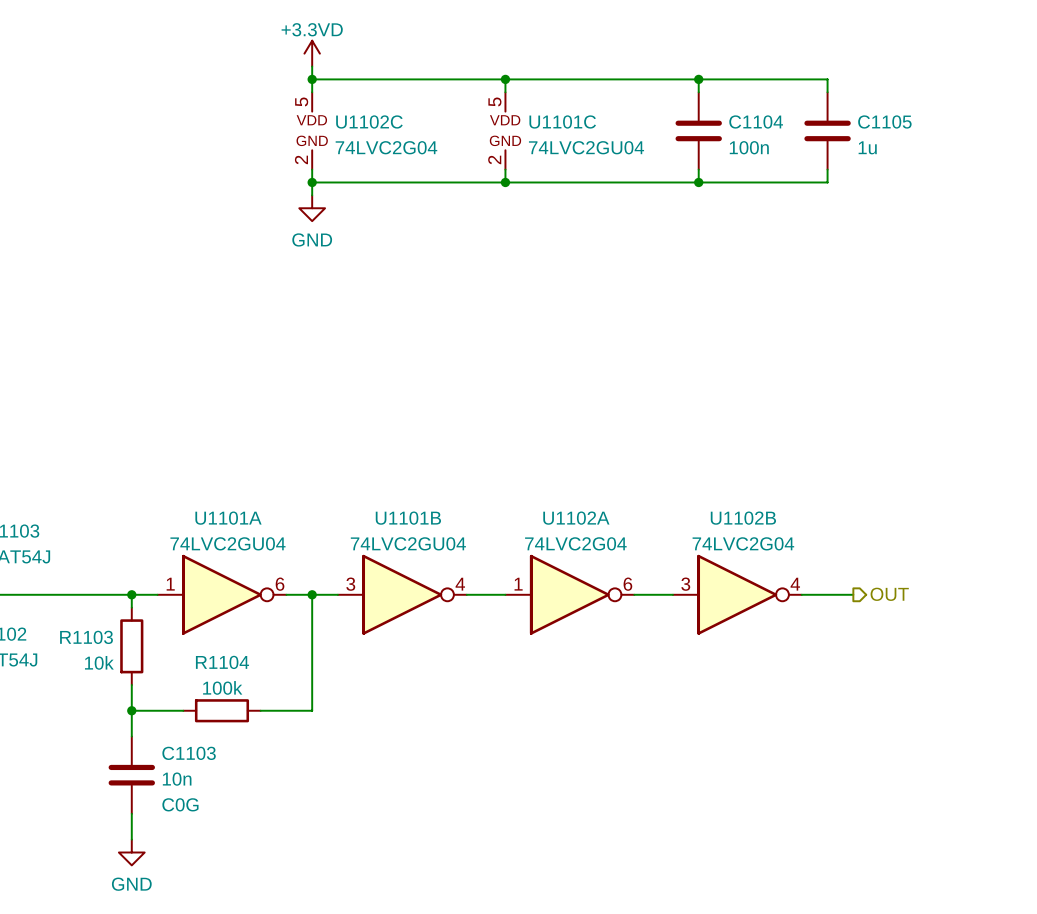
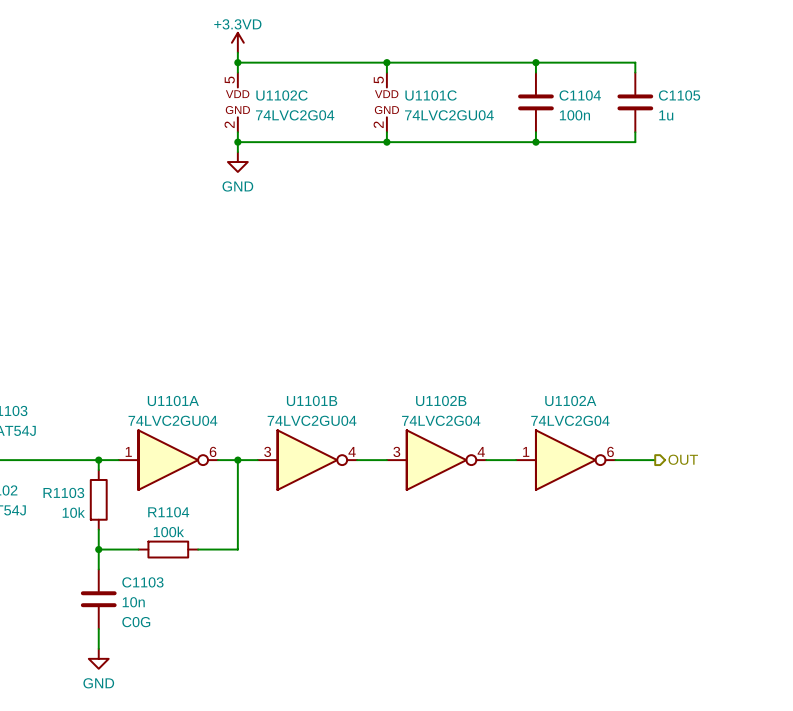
U1102A position: (569, 594) -> (565, 460)
U1102B position: (737, 594) -> (436, 460)

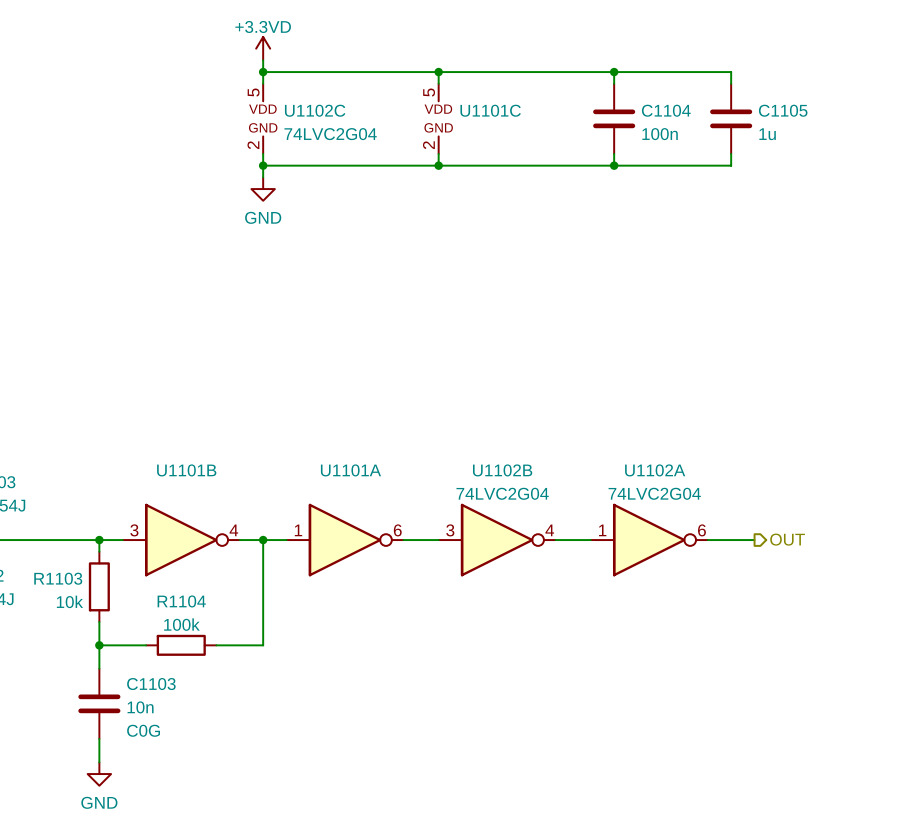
U1101C value: 74LVC2GU04 (449, 115) -> none
U1101A value: 74LVC2GU04 (172, 420) -> none
U1101B value: 74LVC2GU04 (312, 420) -> none
U1101A position: (168, 460) -> (345, 540)
U1101B position: (307, 460) -> (181, 540)

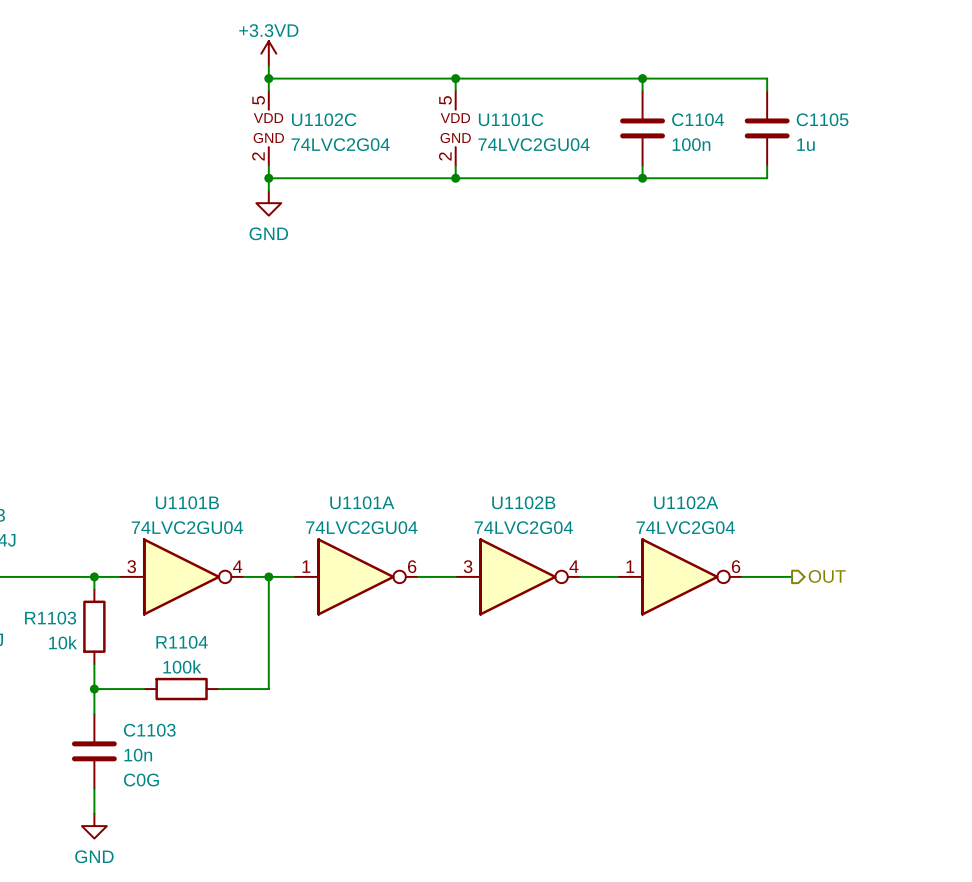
U1101C value: none -> 74LVC2GU04 (534, 144)
U1101B value: none -> 74LVC2GU04 (187, 527)
U1101A value: none -> 74LVC2GU04 (361, 527)

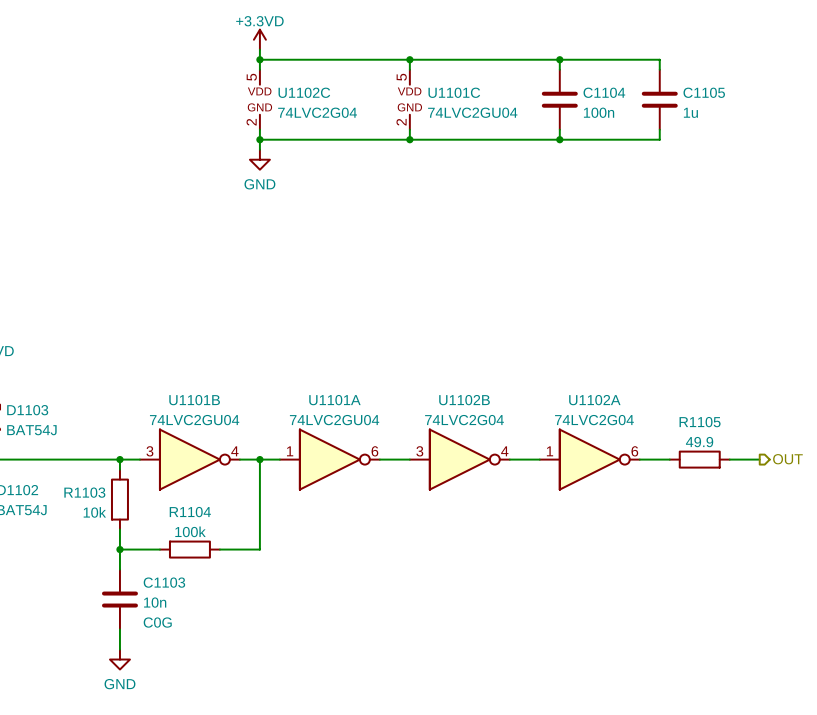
R1105: none -> 49.9 (699, 459)
hierarchical label position: OUT (827, 576) -> OUT (787, 459)
wire: none -> (729, 459) (759, 459)

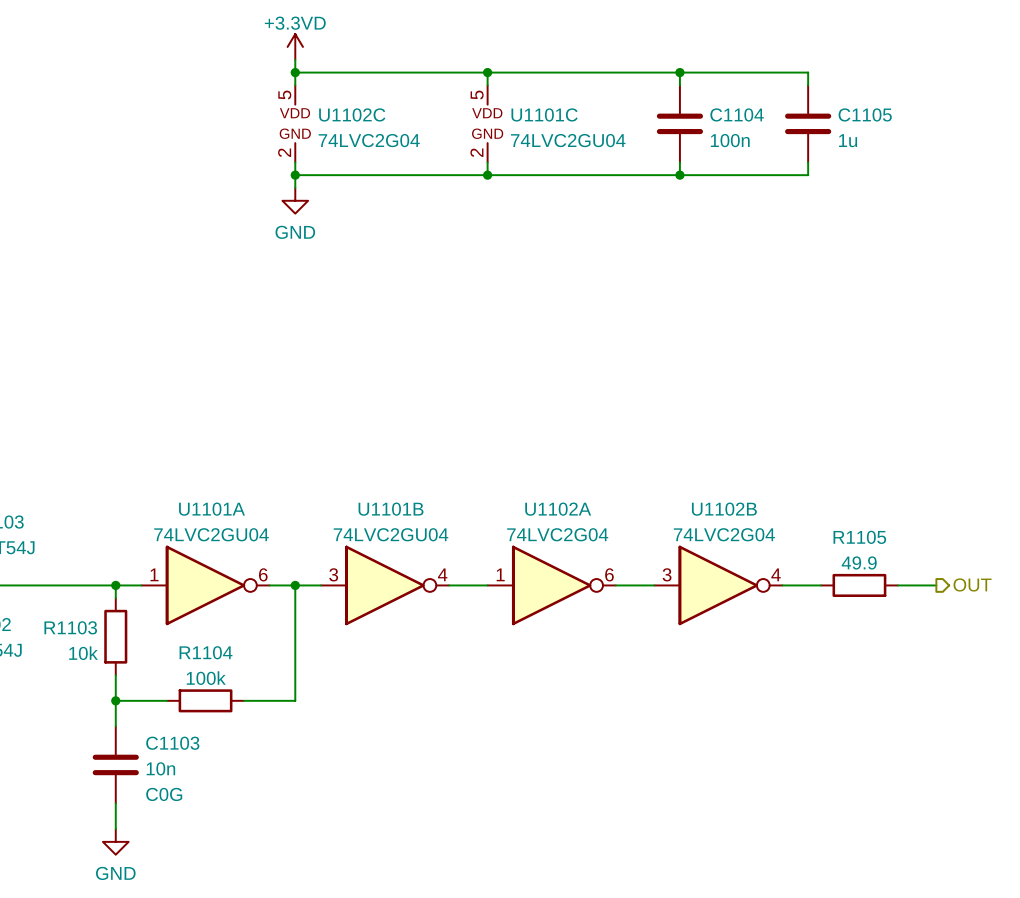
U1101B position: (189, 459) -> (385, 585)
U1101A position: (329, 459) -> (205, 585)
U1102B position: (459, 459) -> (718, 585)
U1102A position: (589, 459) -> (551, 585)

